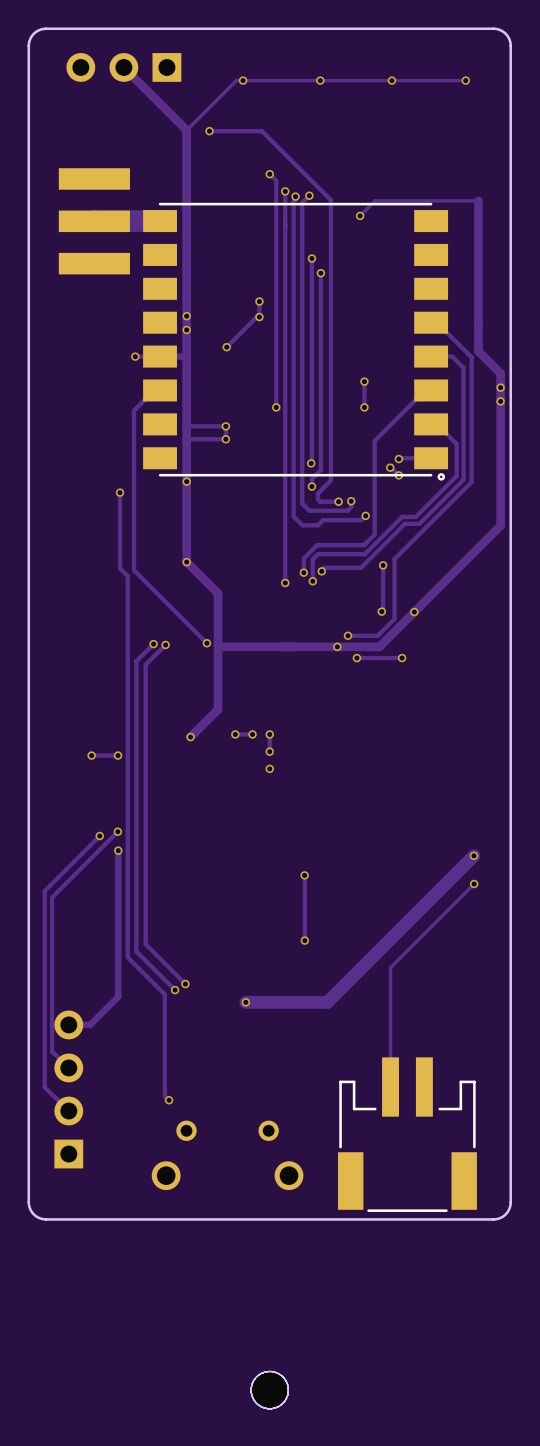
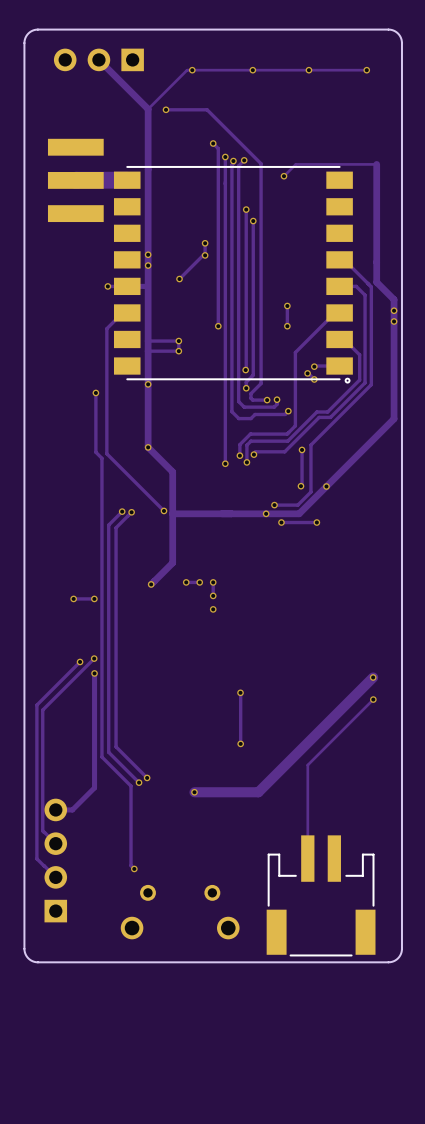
part: (269, 1390) -> none

